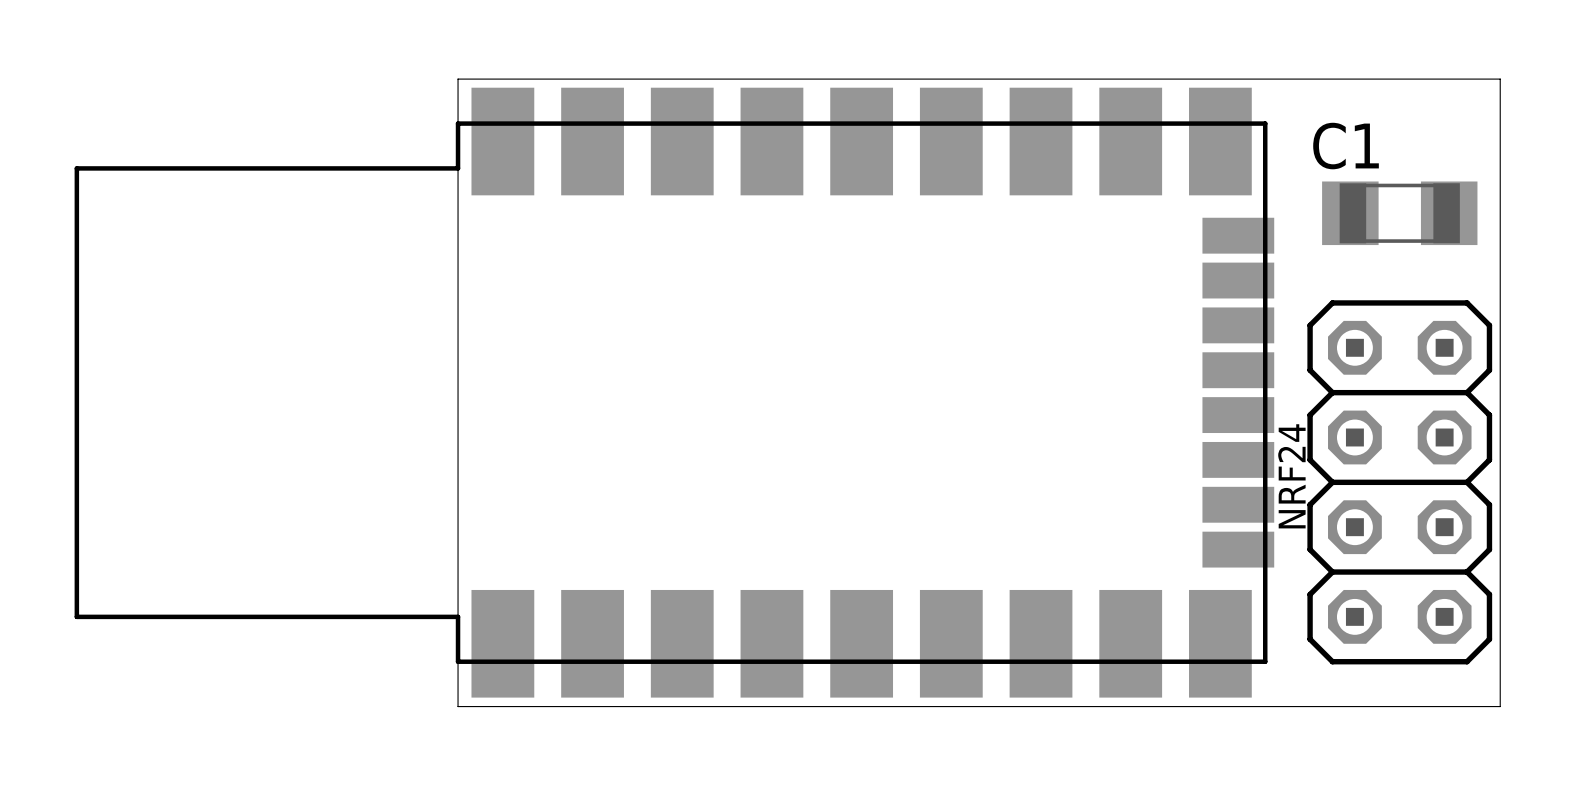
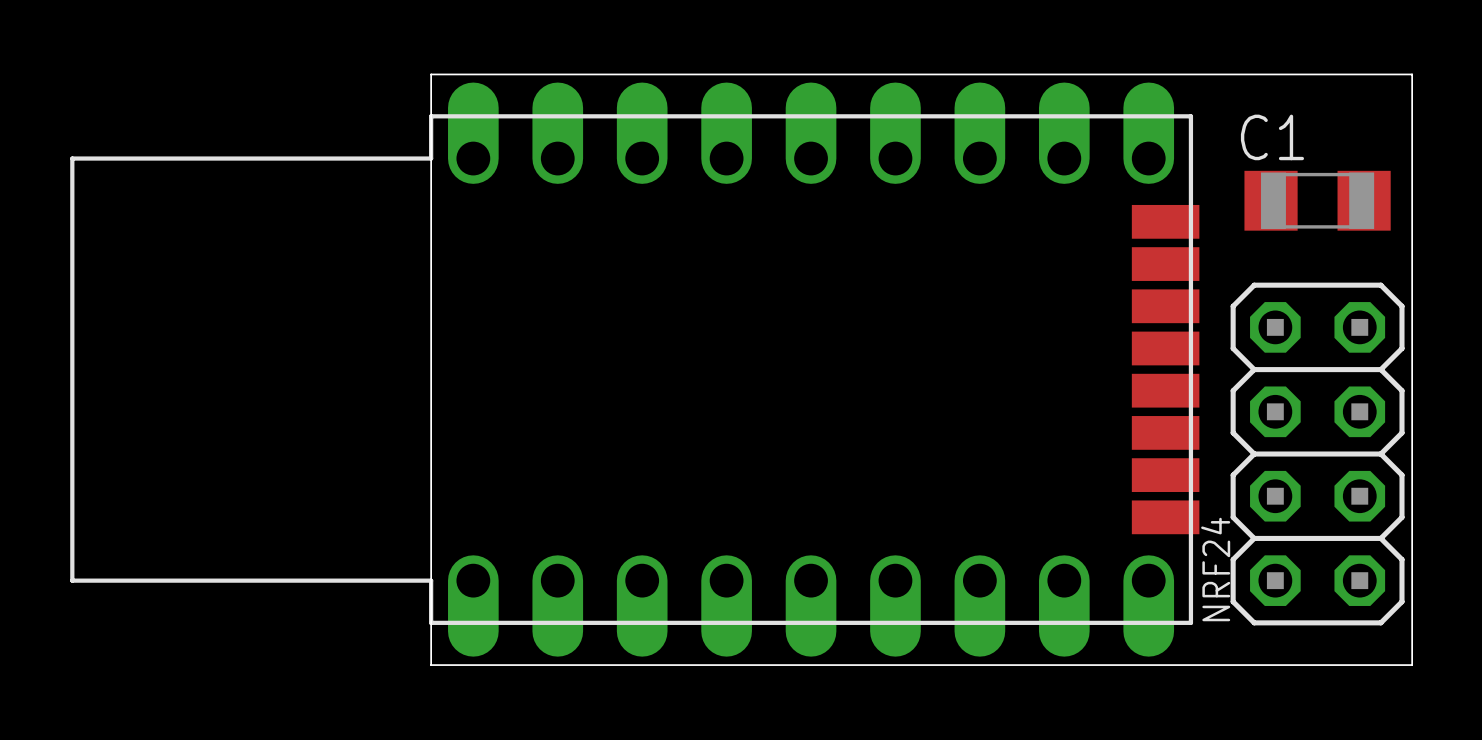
part footprint: [74, 87, 1275, 698] -> [70, 82, 1200, 657]
NRF24 name position: NRF24 (1291, 476) -> NRF24 (1215, 569)

